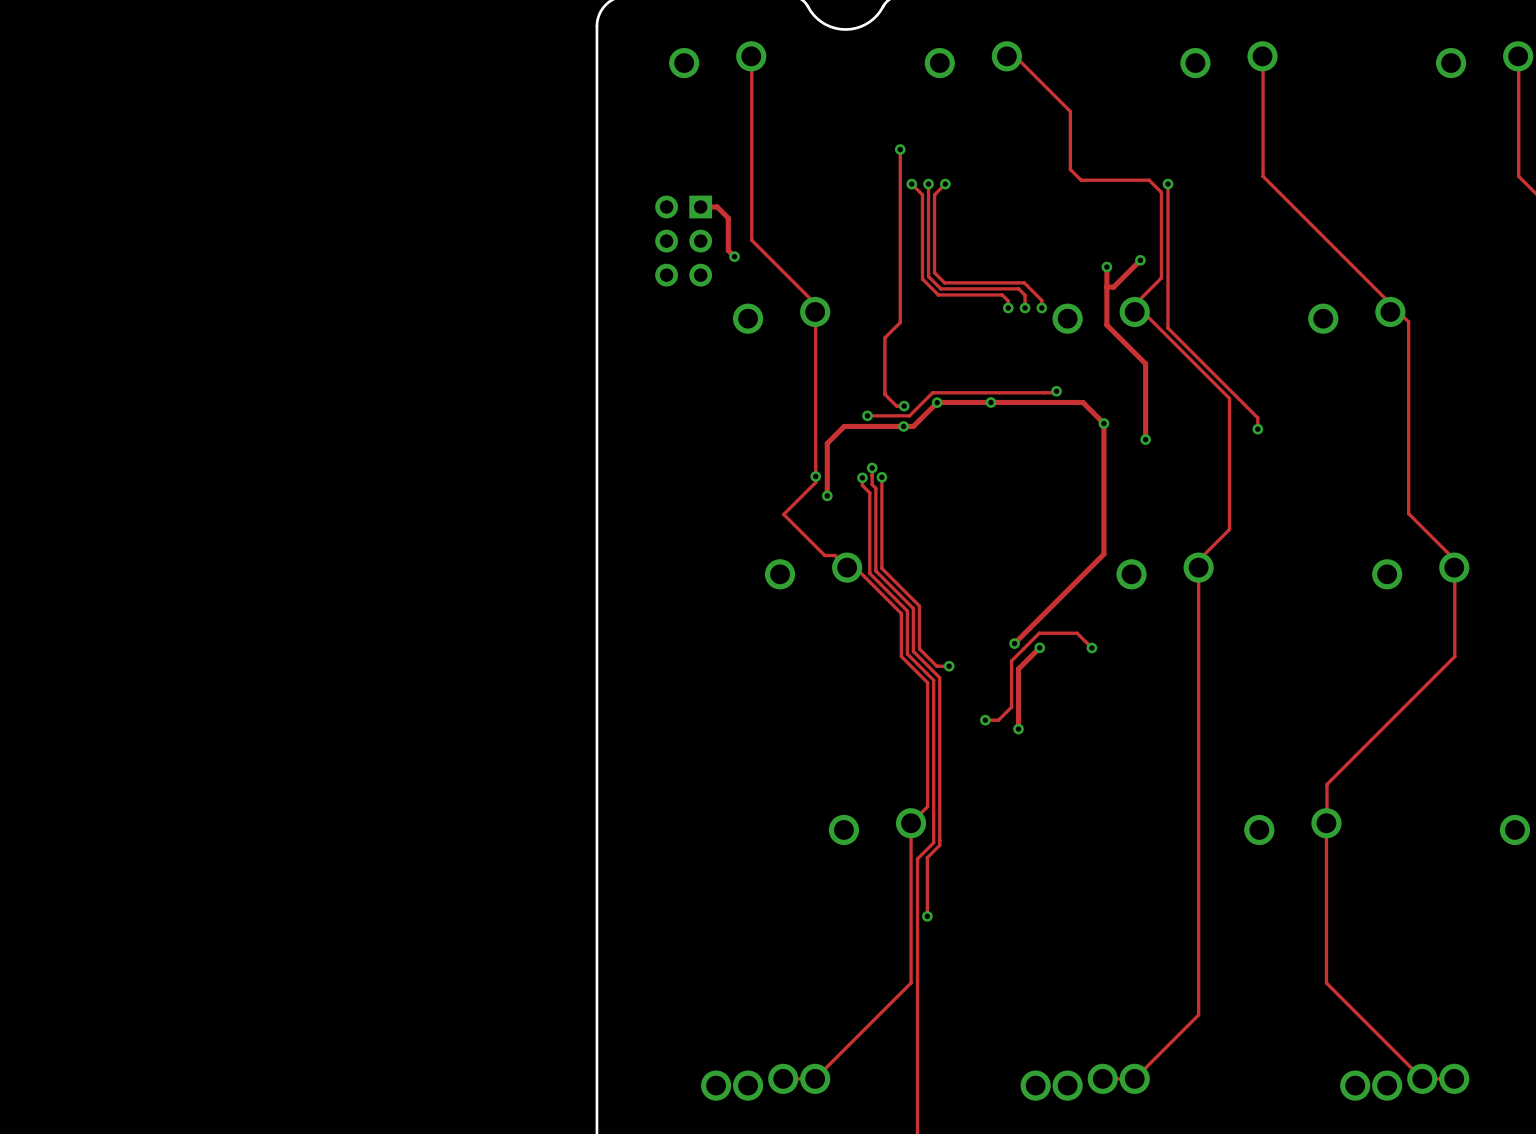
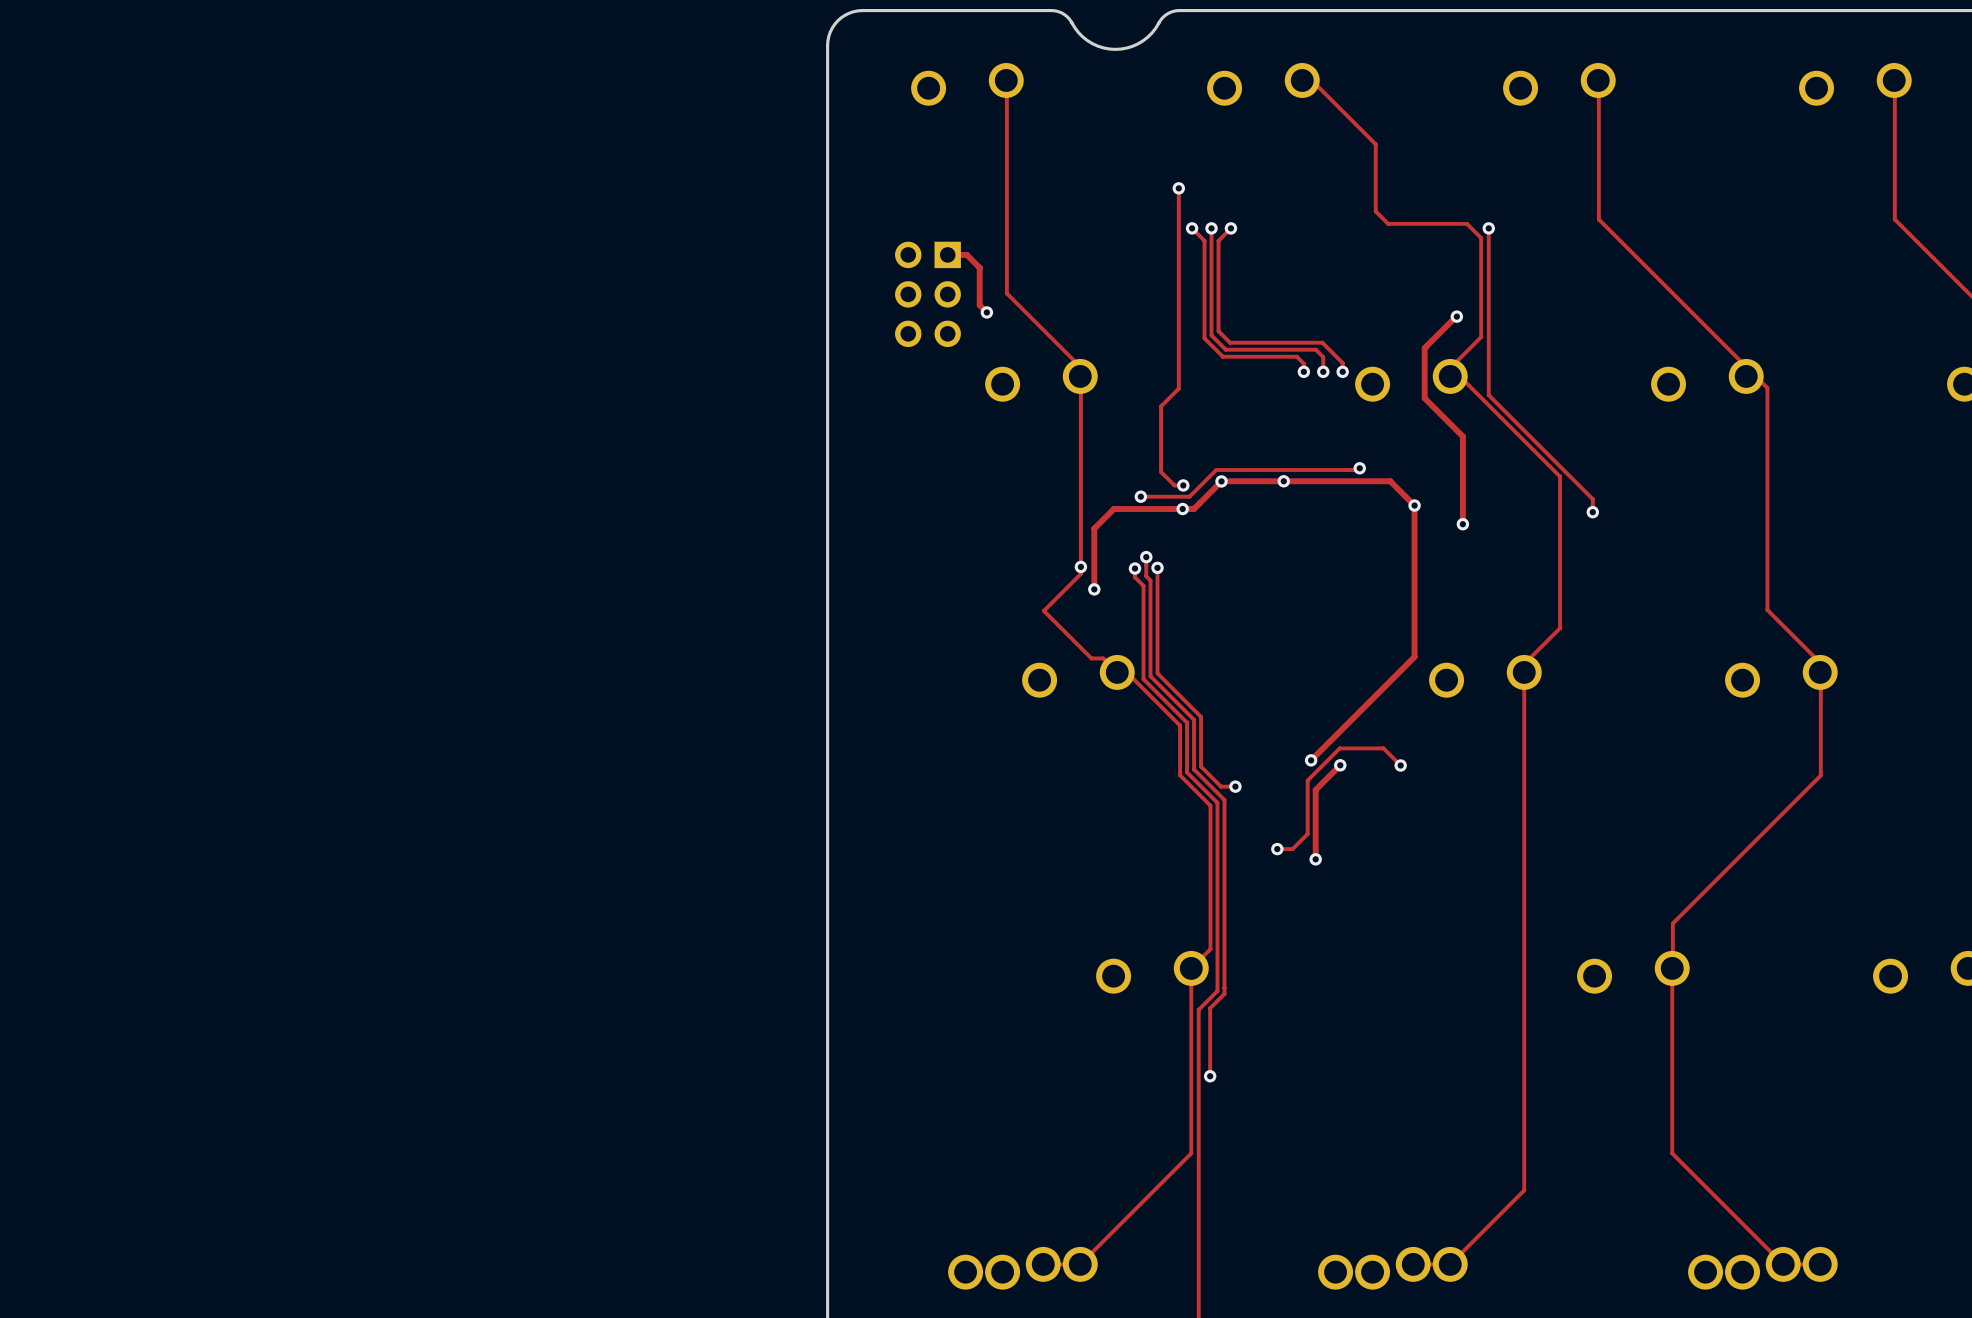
track: (1140, 260) (1113, 287) (1106, 287) -> none
track: (1106, 267) (1106, 325) (1112, 330) -> (1453, 319) (1424, 348) (1424, 398)
via: (1106, 267) -> none

